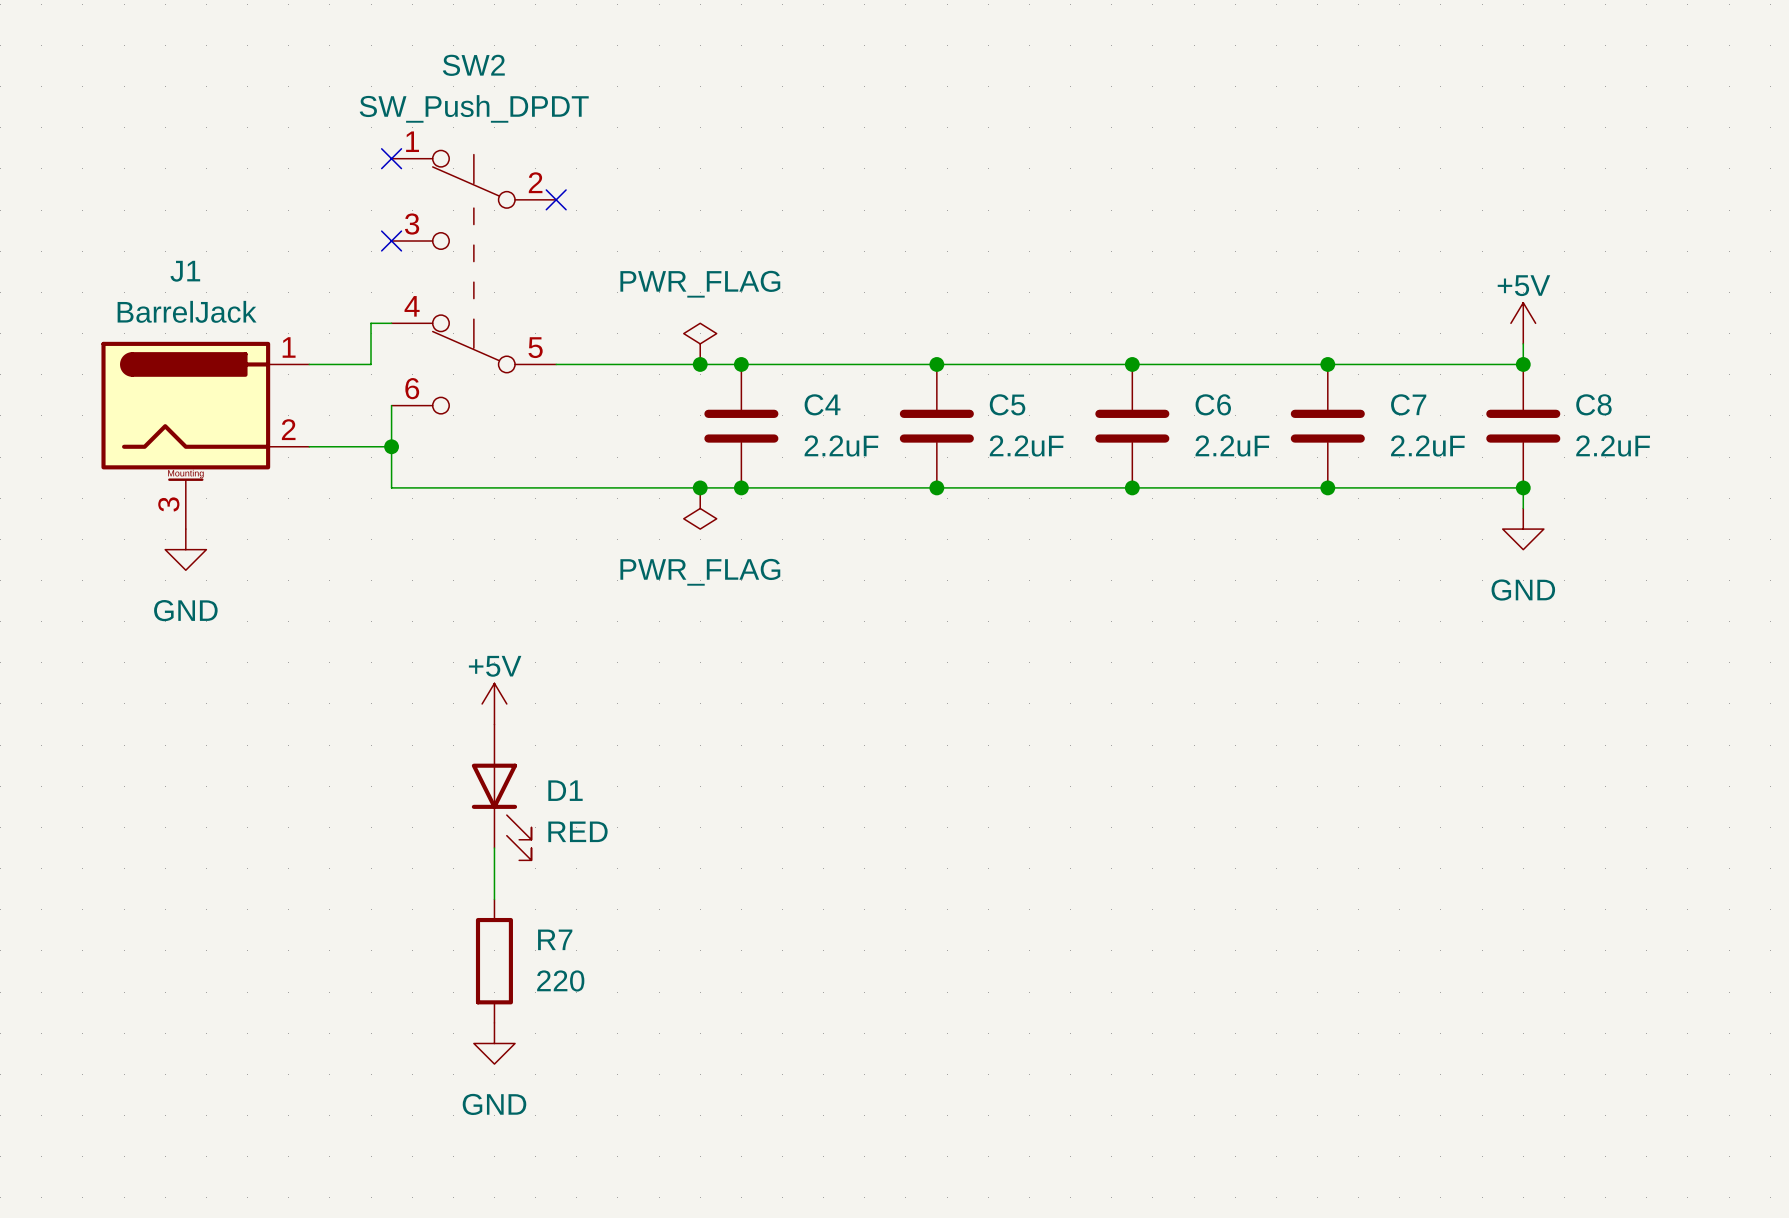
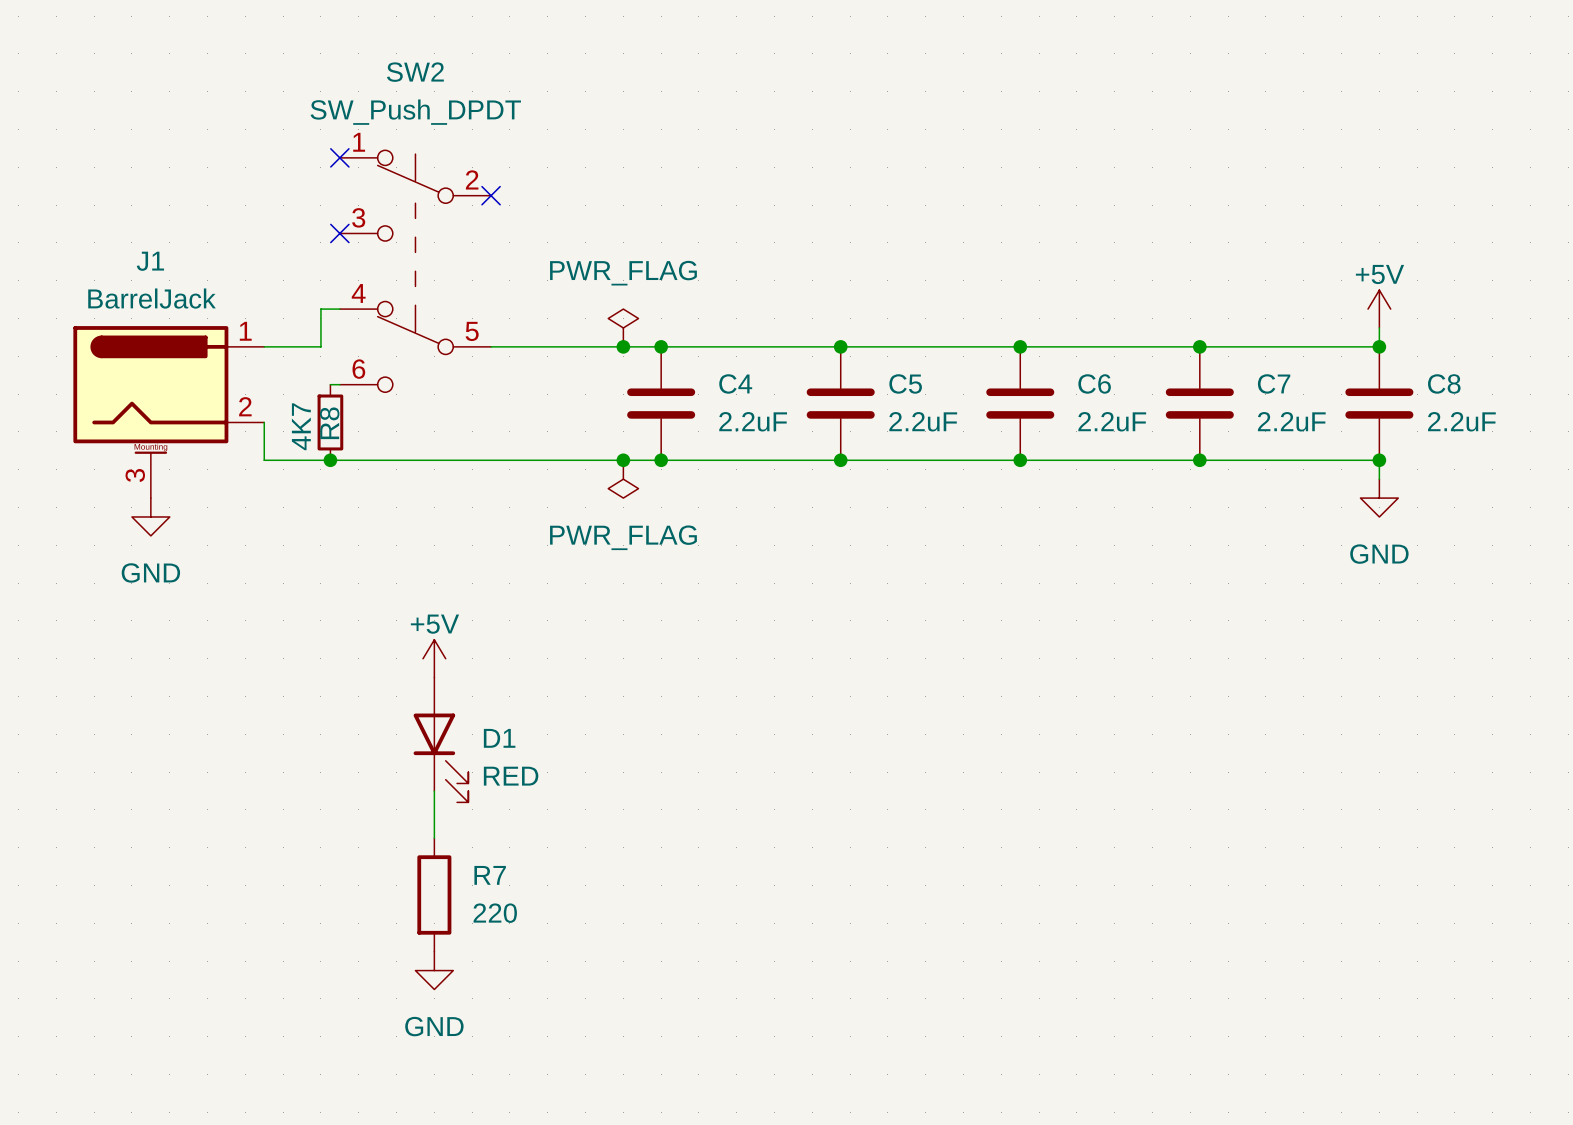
wire: (391, 405) (391, 487) -> (339, 384) (330, 384)
wire: (309, 446) (391, 446) -> (264, 422) (264, 460) (339, 460)
R8: none -> 4K7 (330, 422)
junction position: (391, 446) -> (330, 460)

